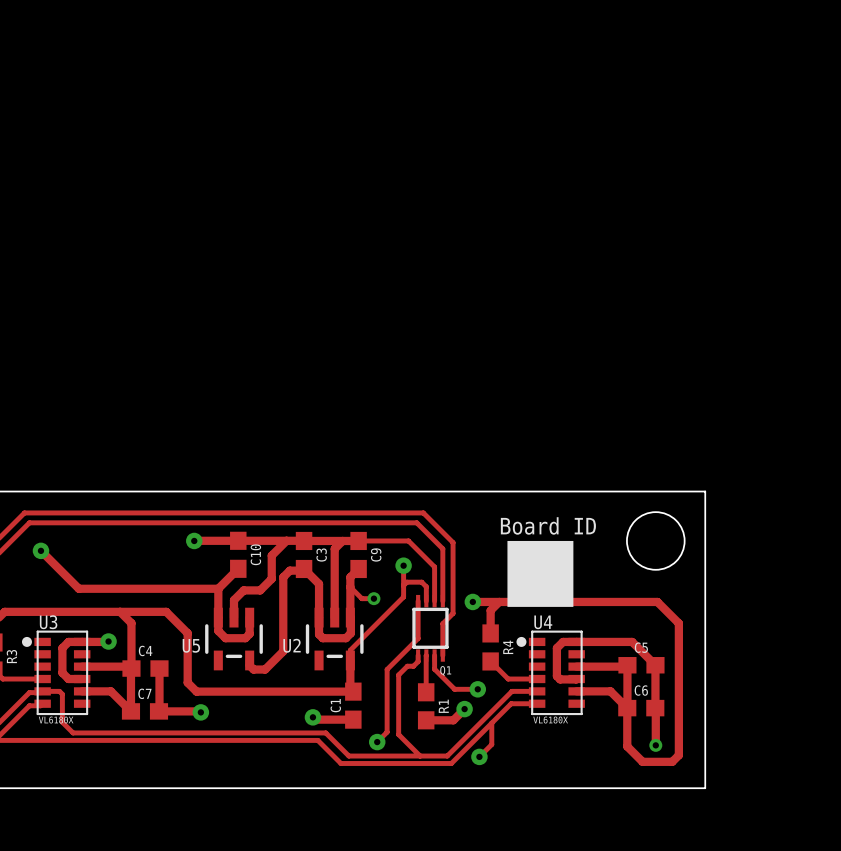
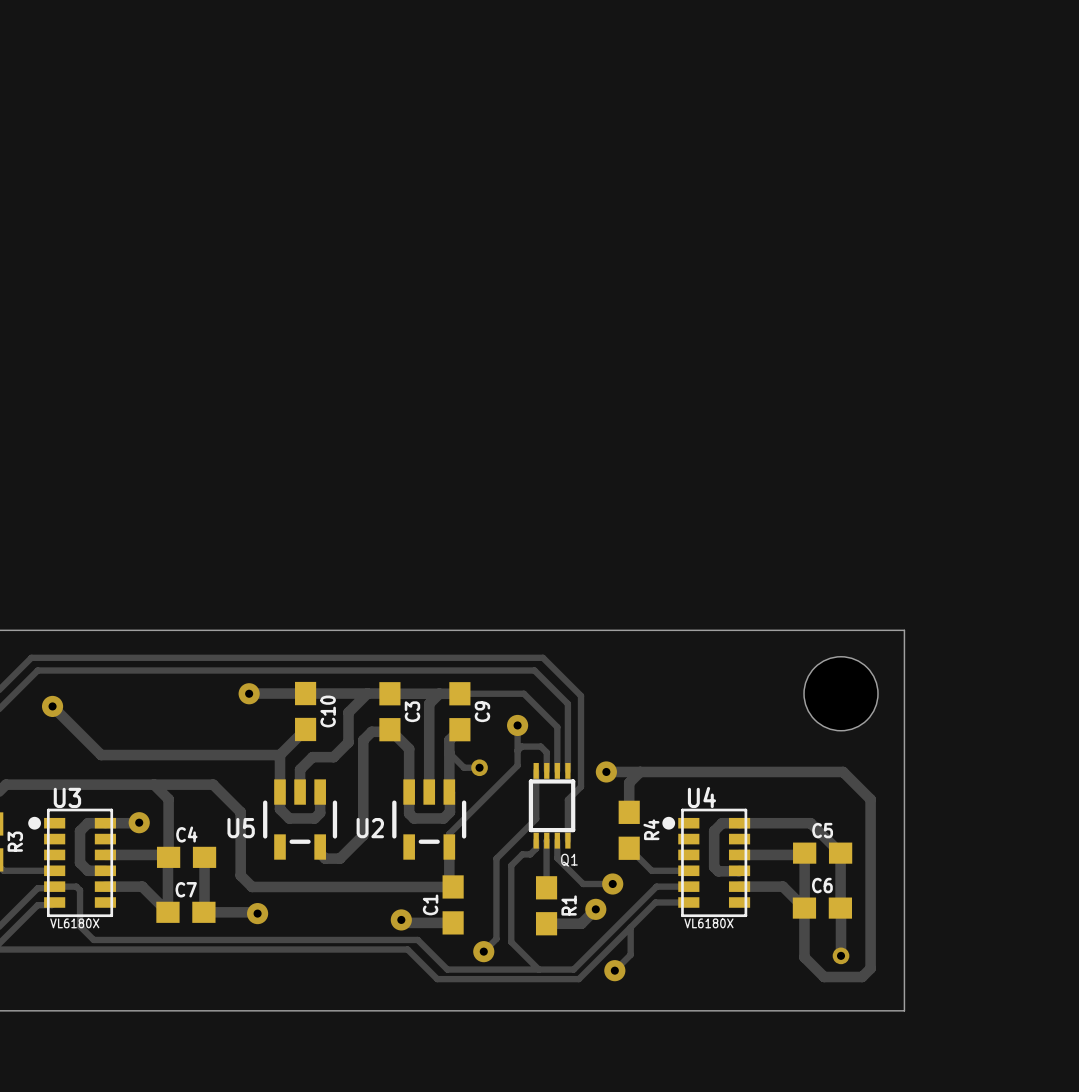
text: Board ID (548, 525) -> none
drawing: [507, 540, 574, 607] -> none

